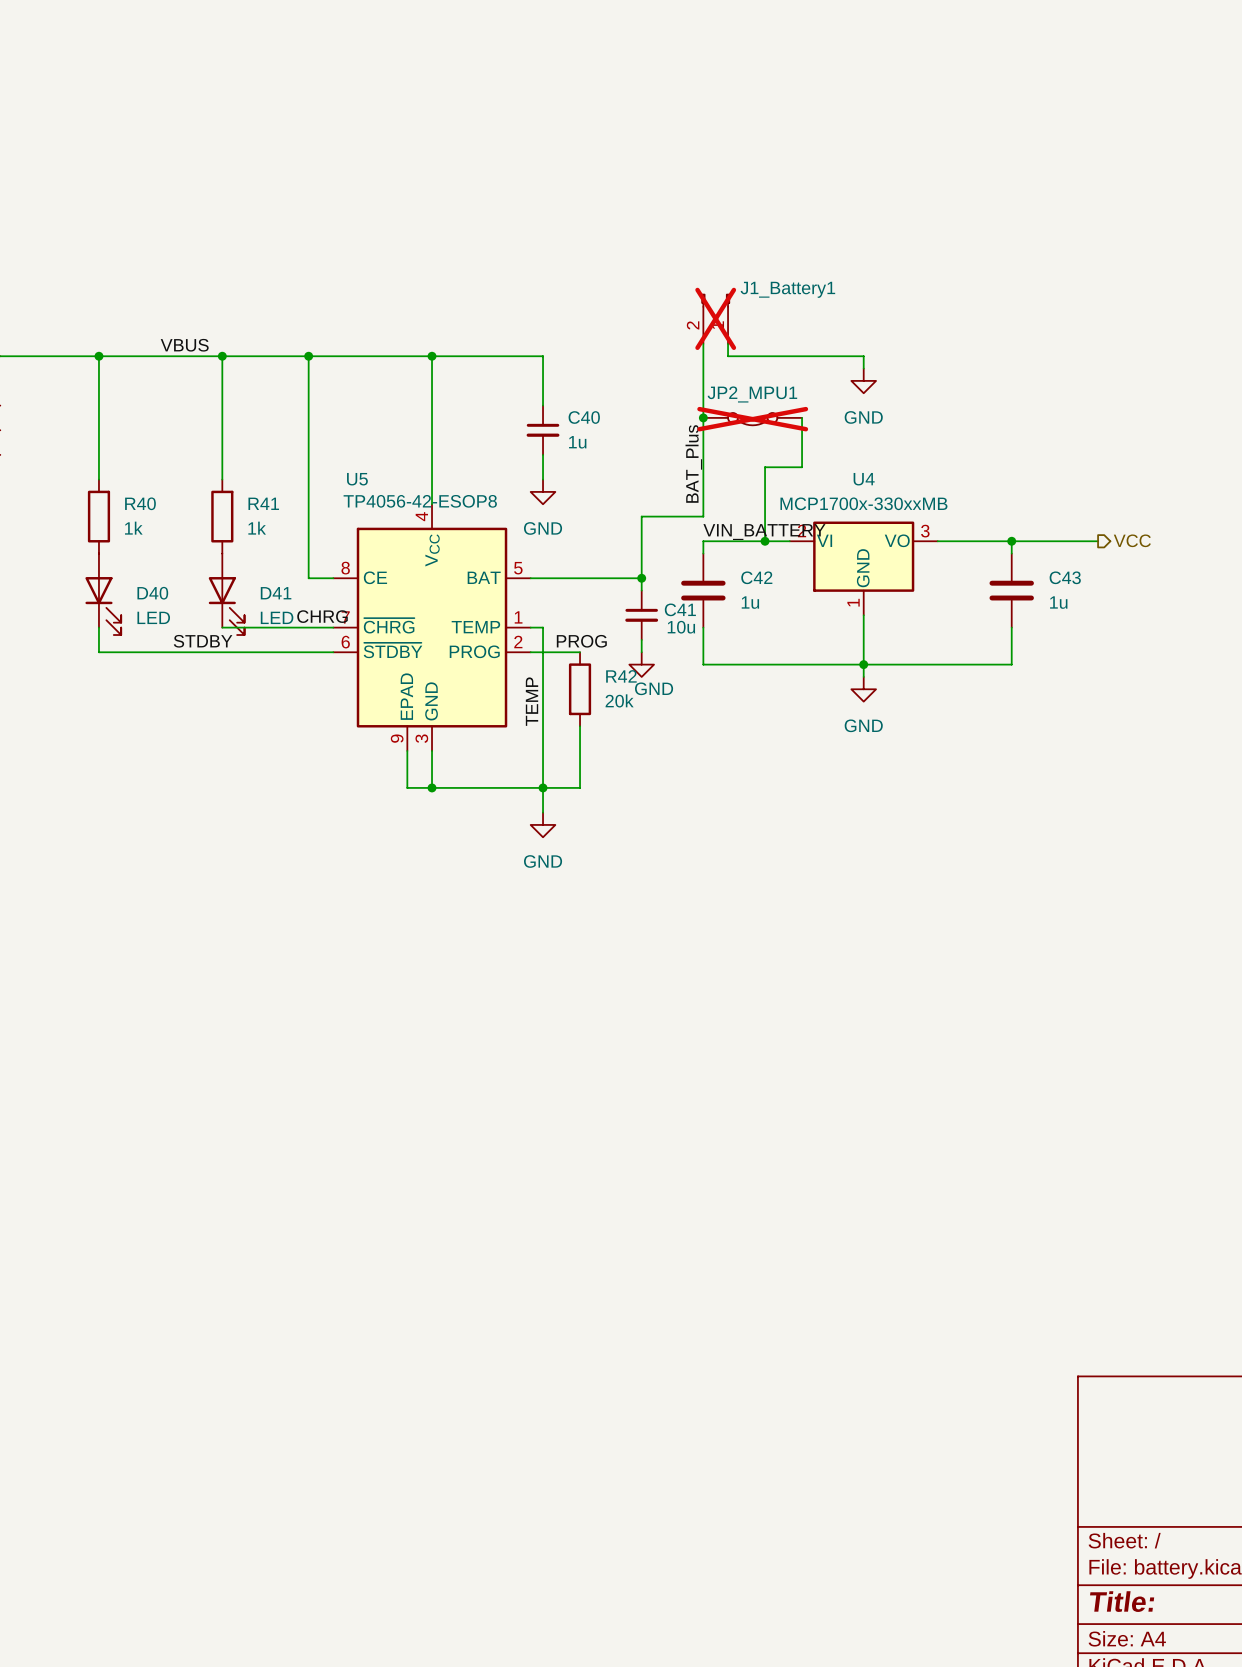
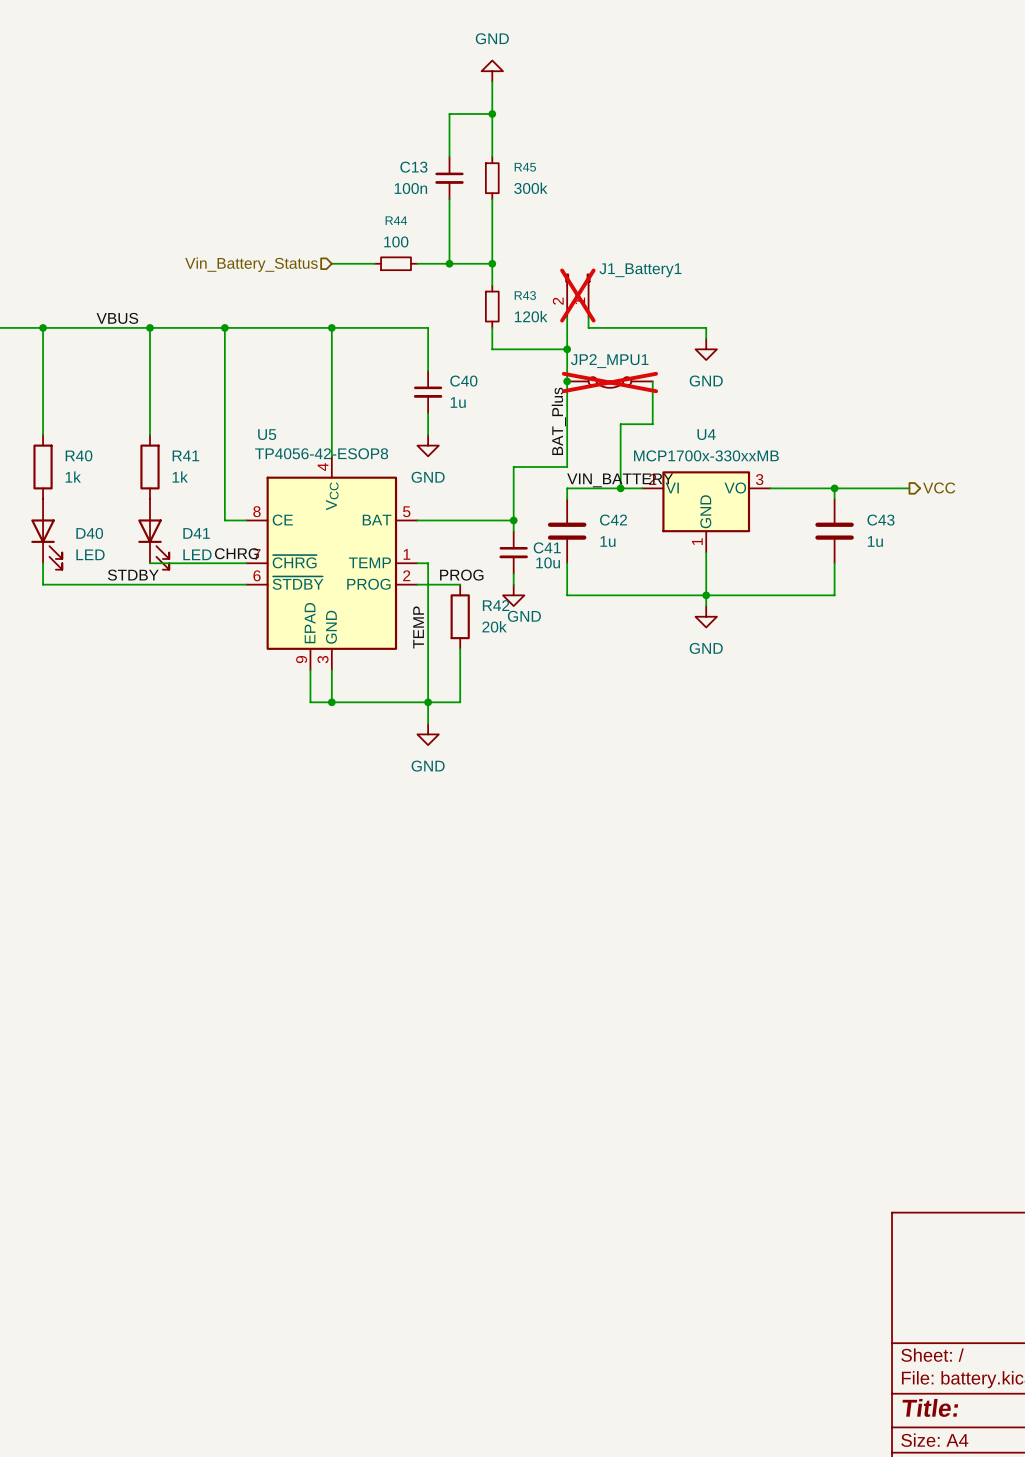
power symbol: none -> GND (492, 71)
wire: none -> (492, 81) (492, 156)
wire: none -> (492, 114) (449, 114) (449, 156)
junction: none -> (492, 114)
C13: none -> 100n (449, 178)
R45: none -> 300k (492, 178)
wire: none -> (449, 199) (449, 263)
wire: none -> (492, 199) (492, 285)
wire: none -> (331, 263) (374, 263)
R44: none -> 100 (396, 263)
wire: none -> (417, 263) (492, 263)
junction: none -> (449, 263)
junction: none -> (492, 263)
hierarchical label: none -> Vin_Battery_Status (251, 264)
R43: none -> 120k (492, 306)
wire: none -> (492, 327) (492, 349) (567, 349)
junction: none -> (567, 349)

